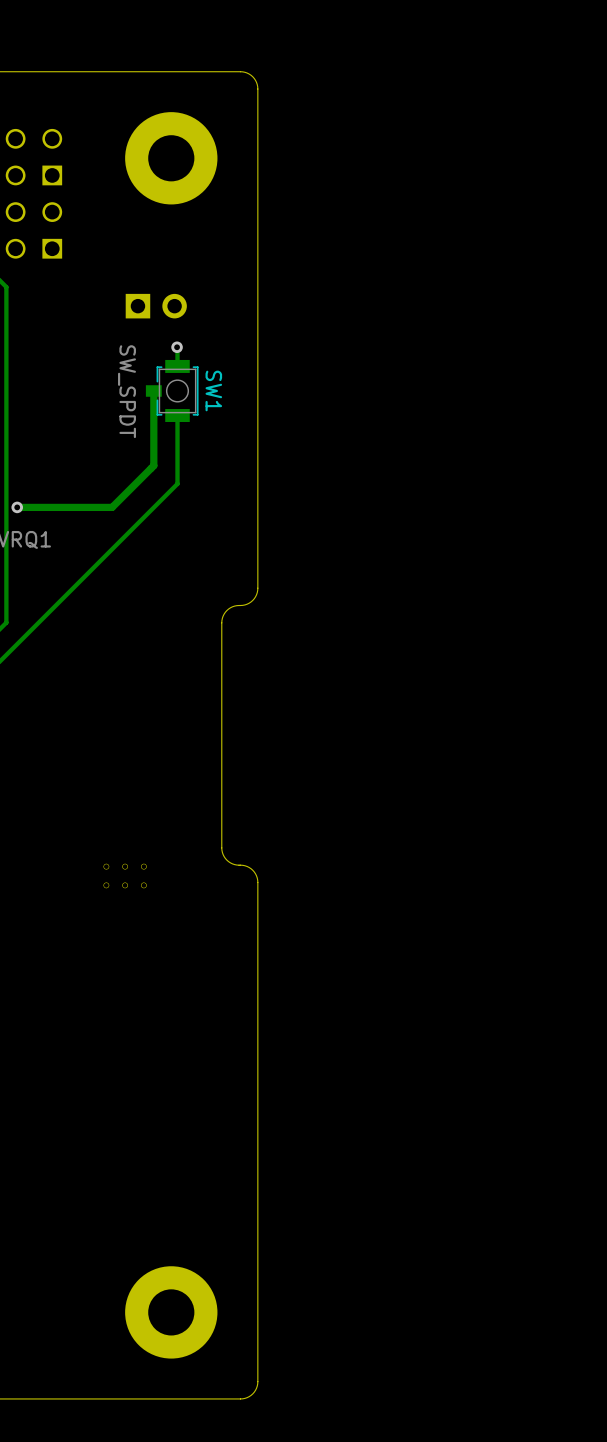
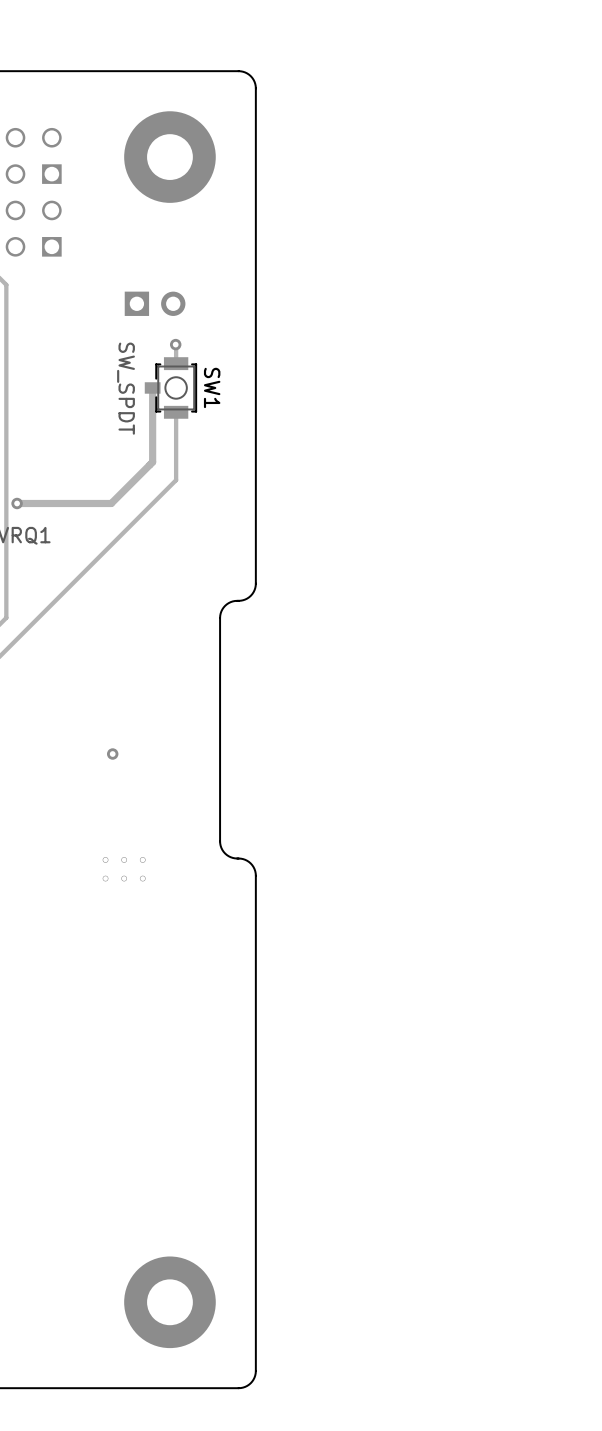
via: none -> (112, 754)

